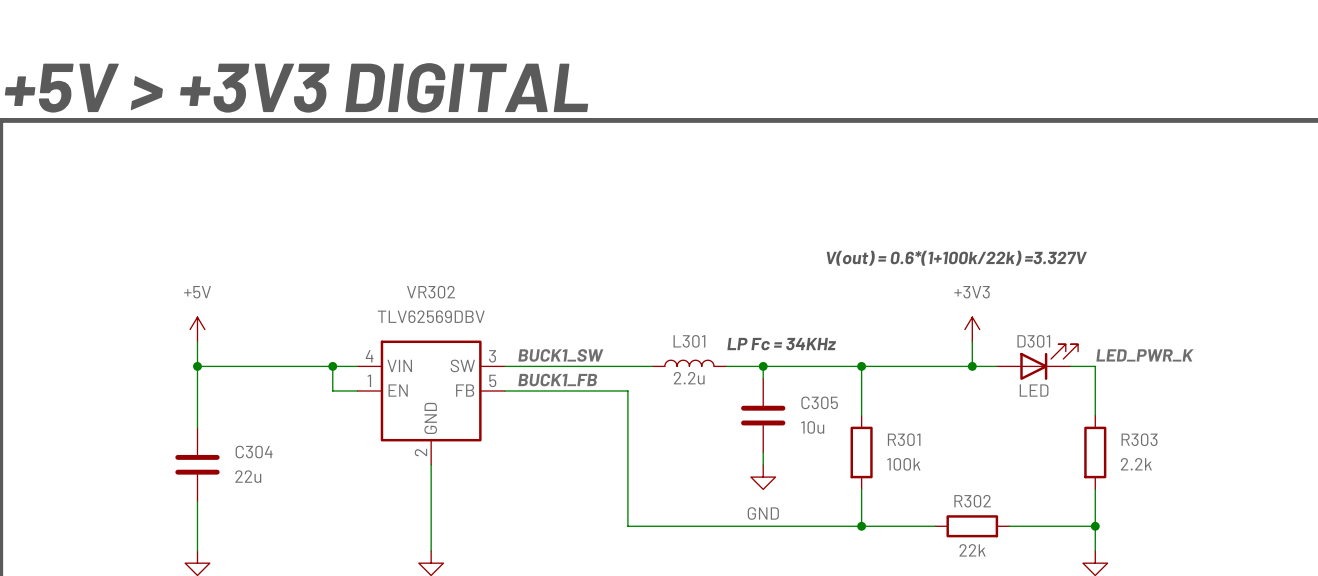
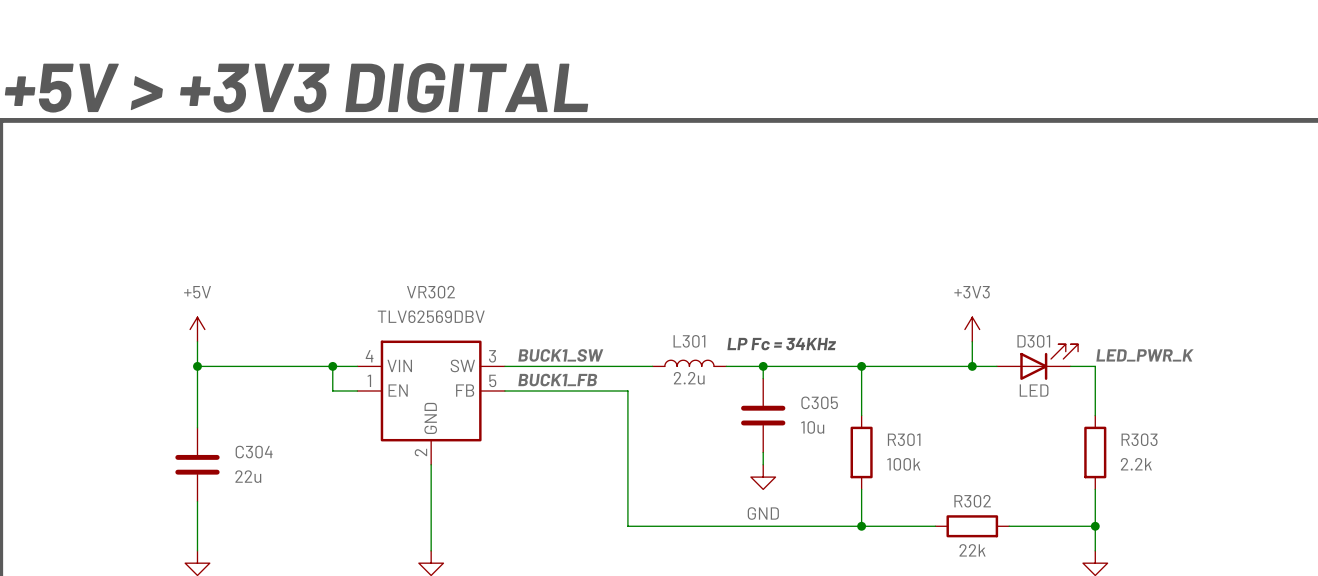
text: V(out) = 0.6*(1+100k/22k) =3.327V (956, 258) -> none

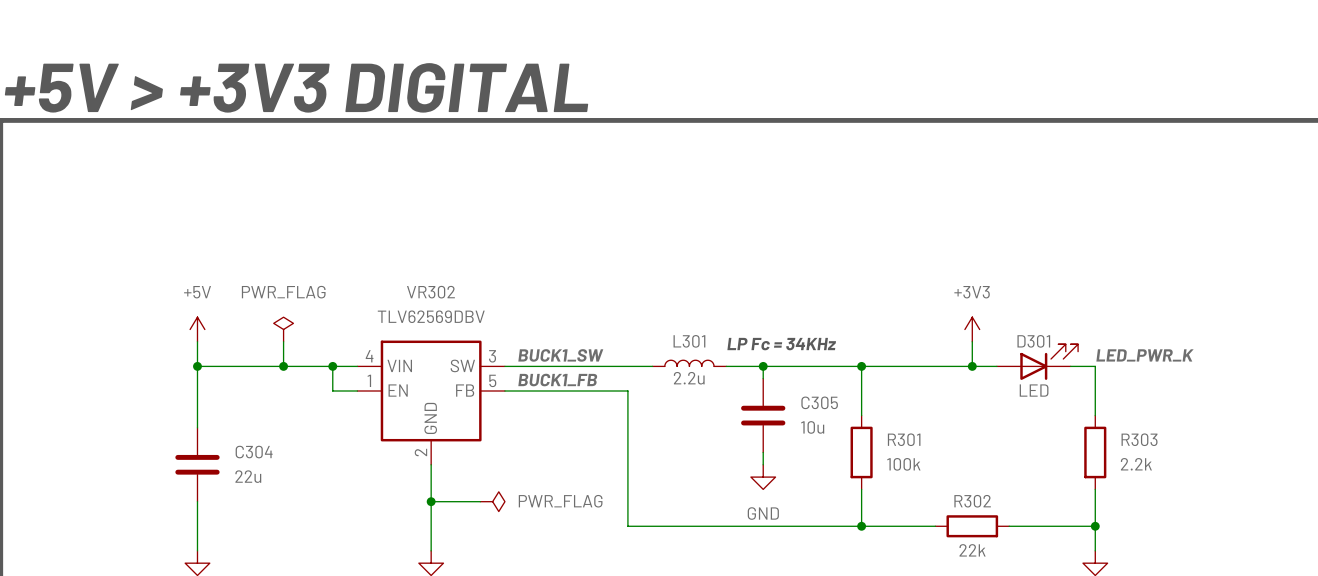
power symbol: none -> PWR_FLAG (283, 329)
wire: none -> (283, 341) (283, 366)
junction: none -> (283, 366)
wire: none -> (431, 501) (480, 501)
junction: none -> (431, 501)
power symbol: none -> PWR_FLAG (492, 501)

